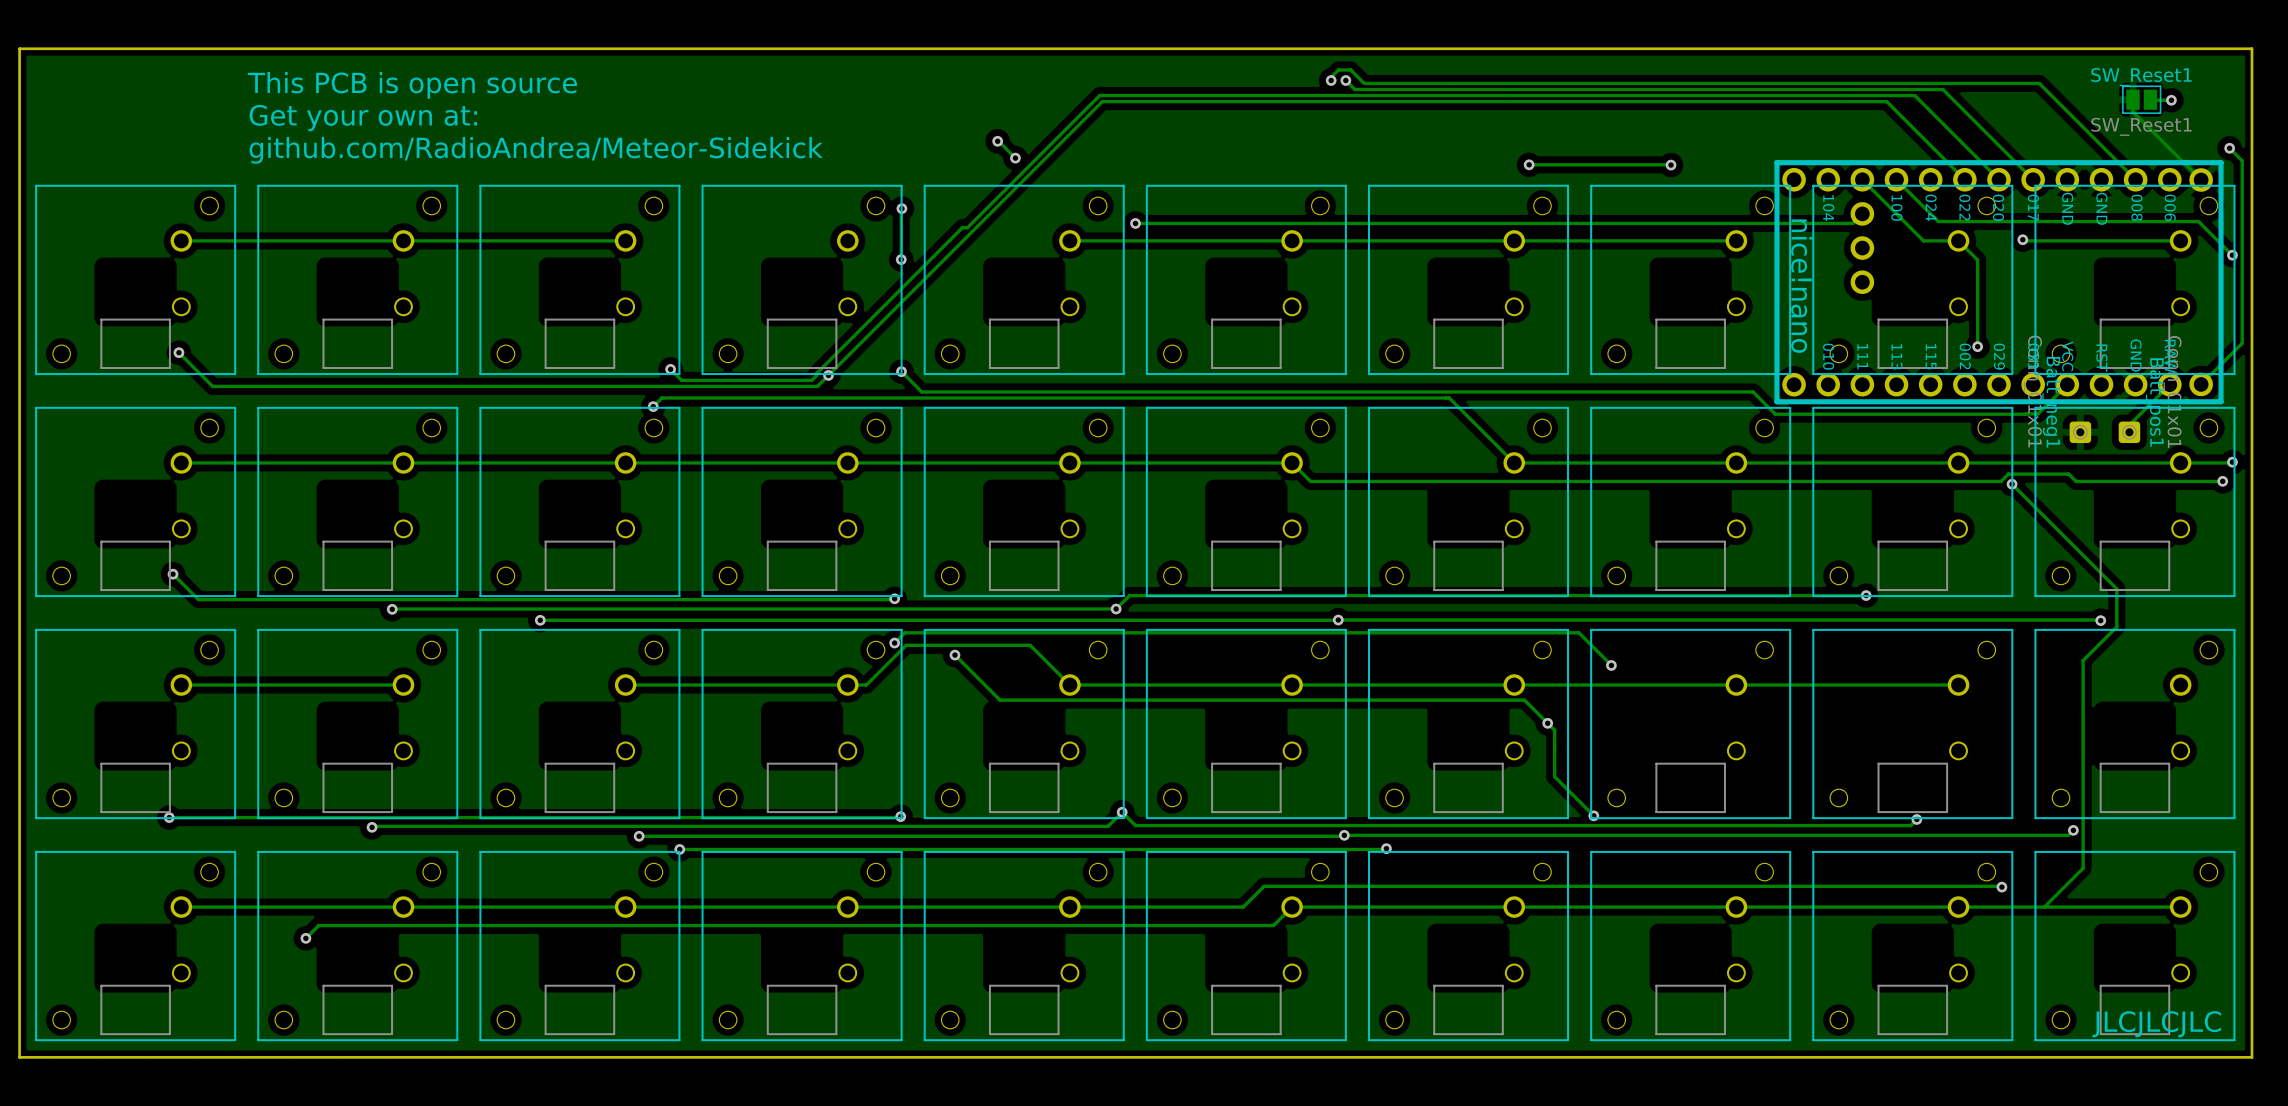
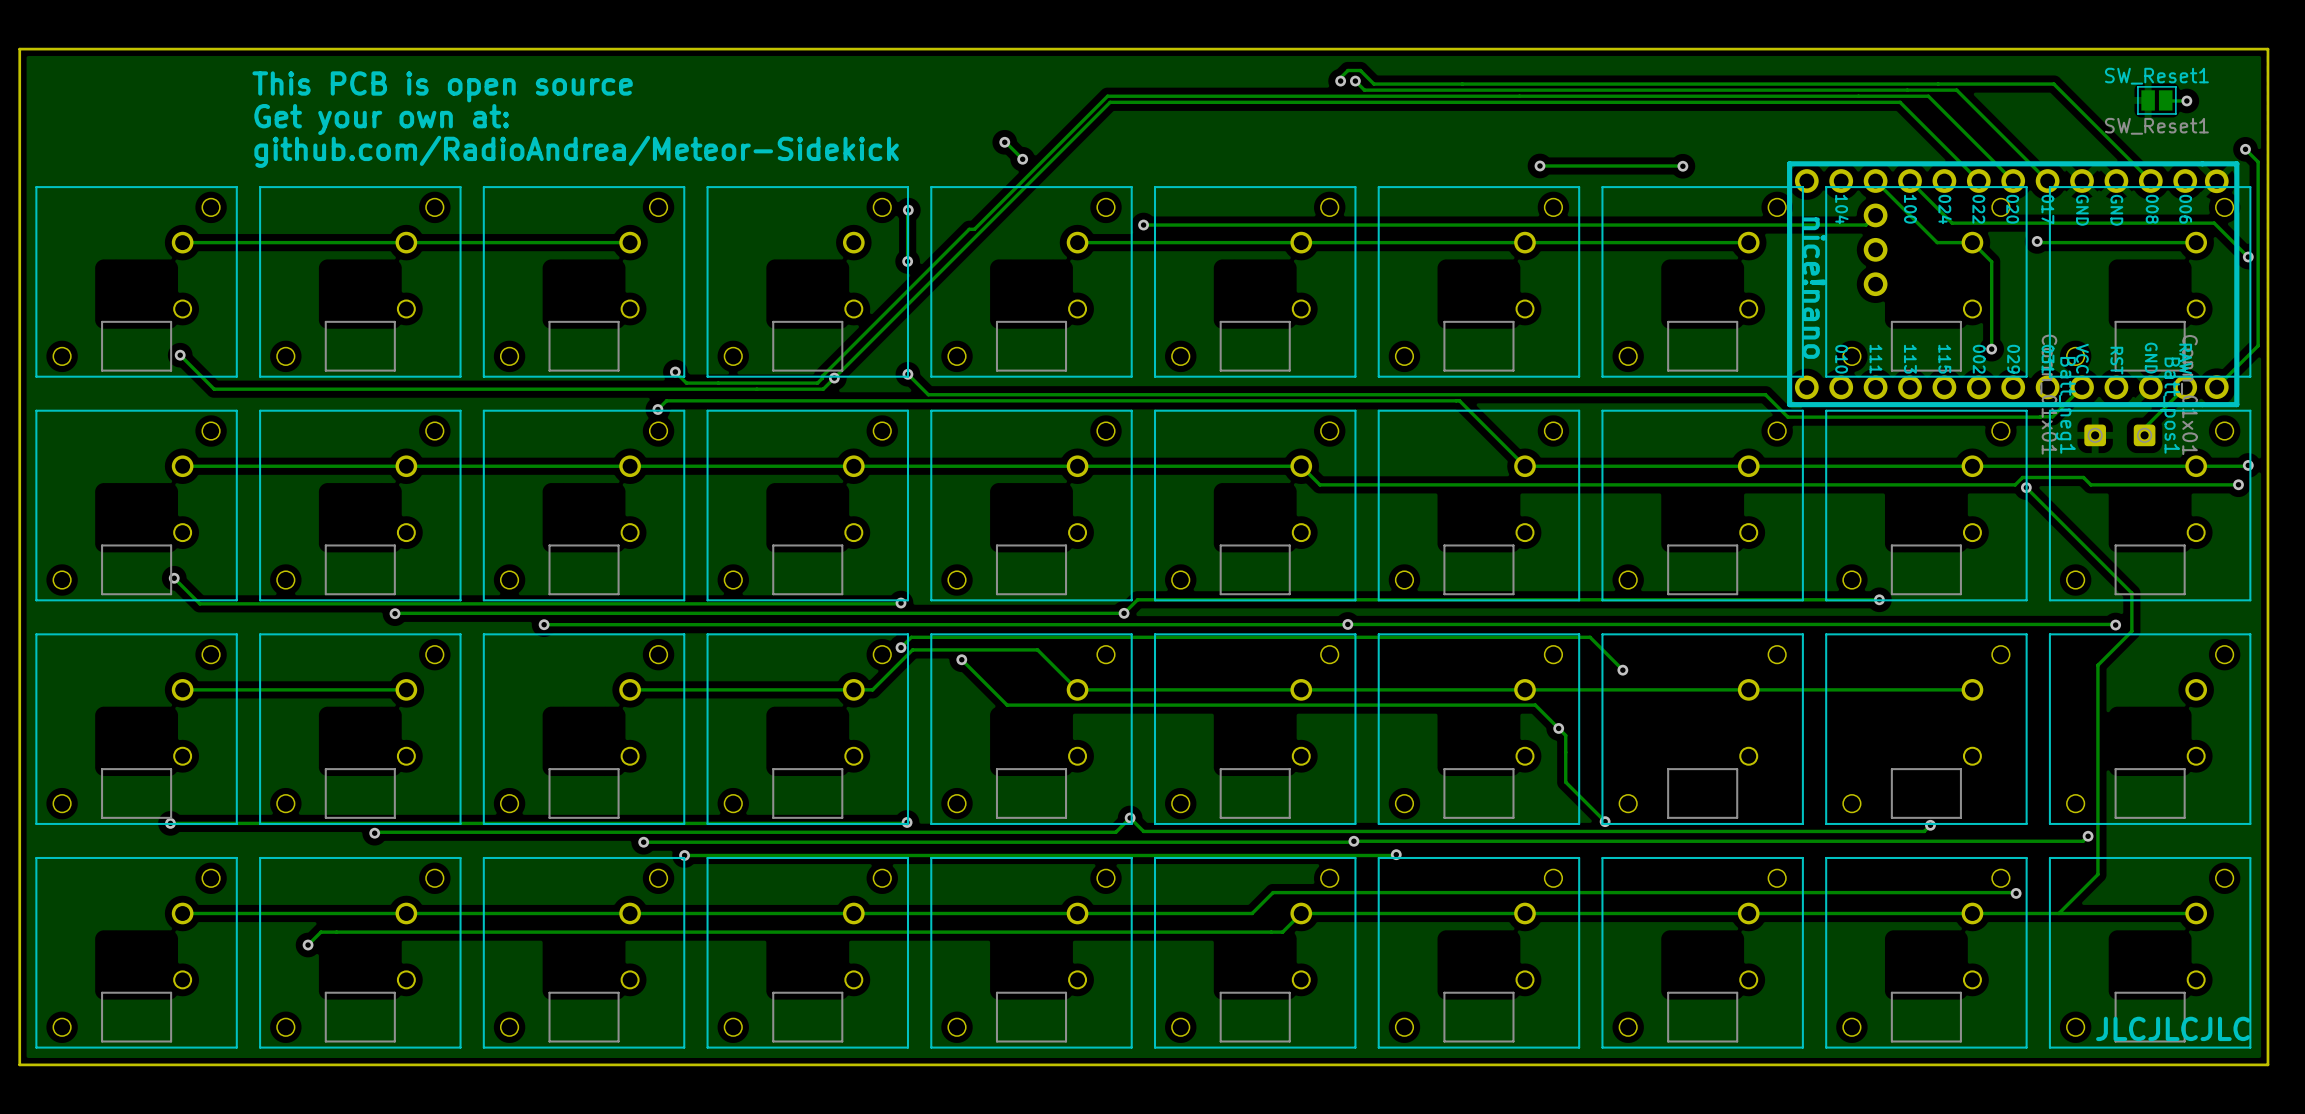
track: (2132, 99) (2132, 111) (2201, 180) -> none

